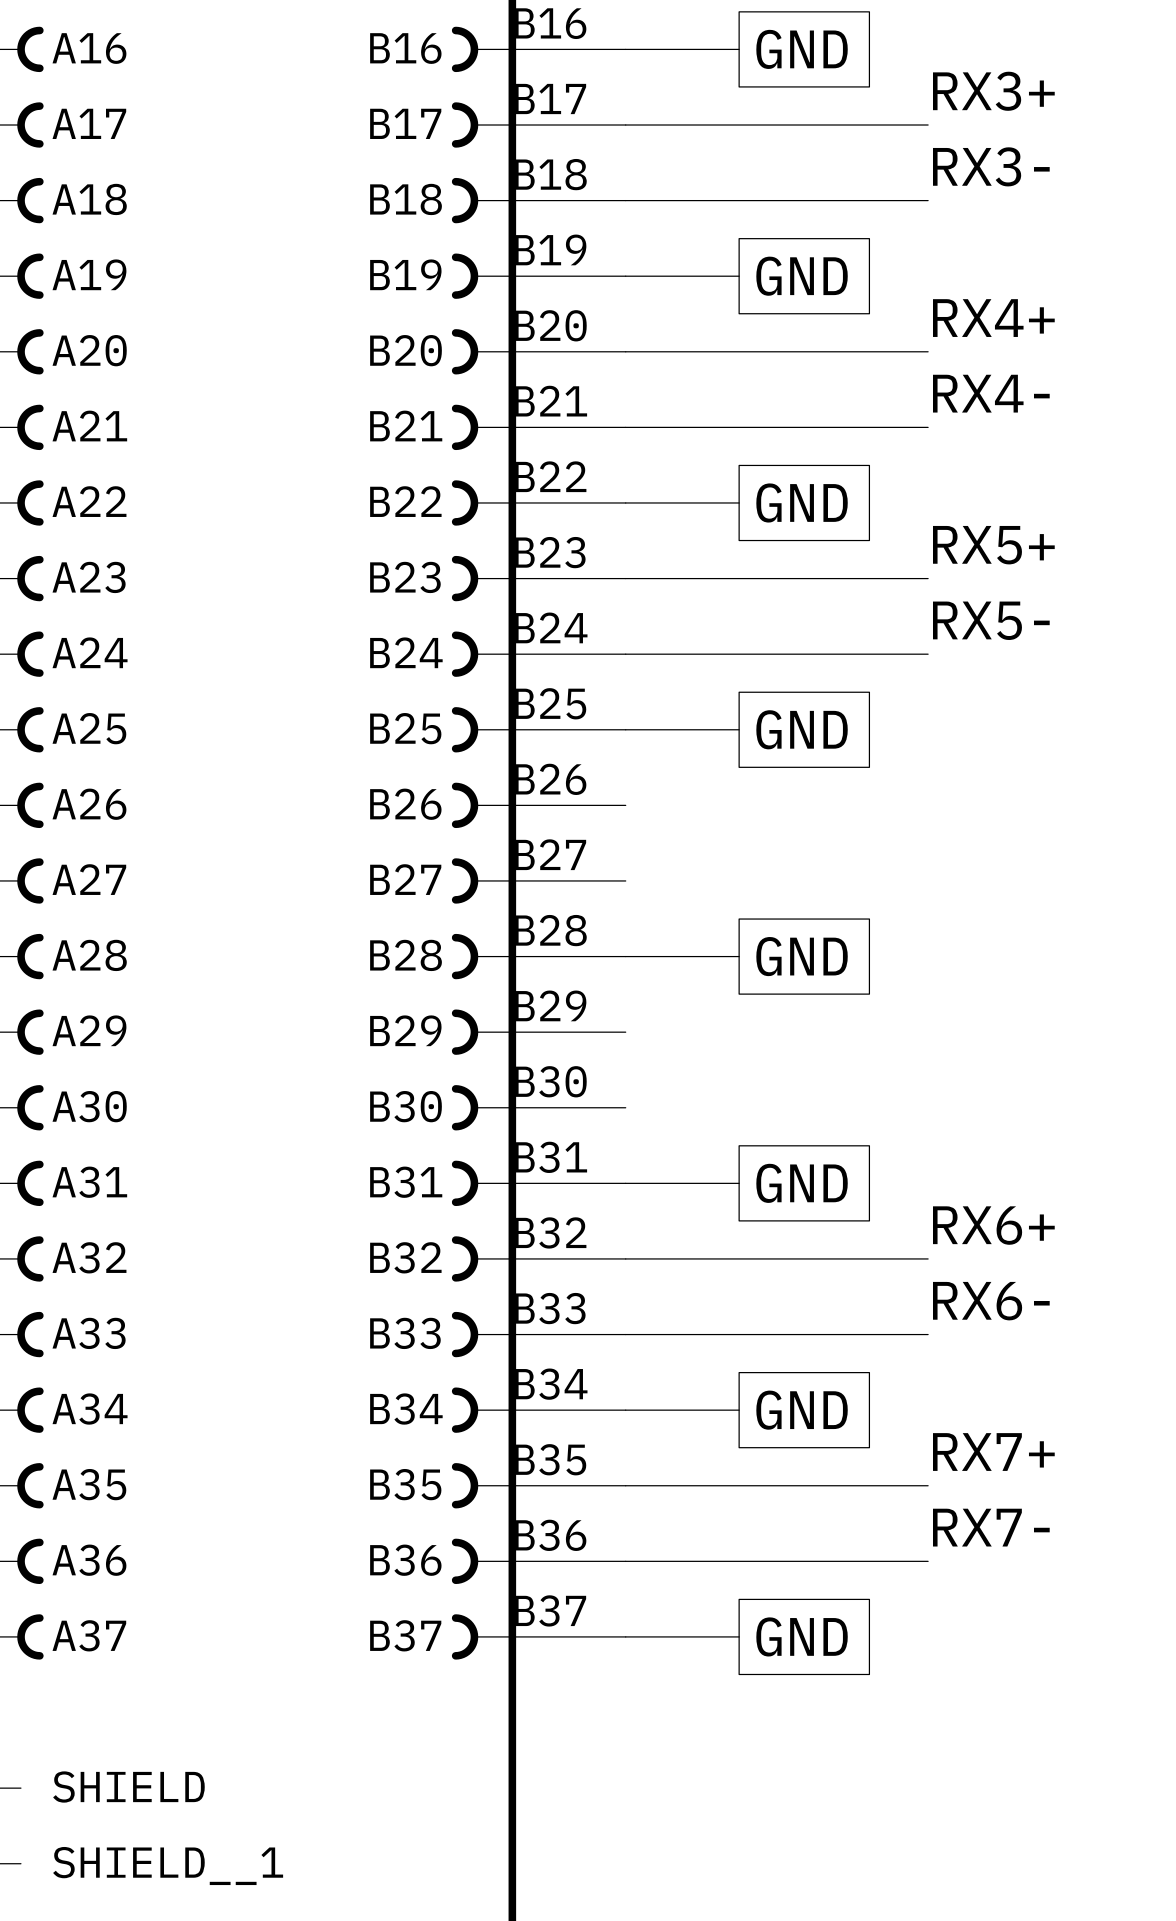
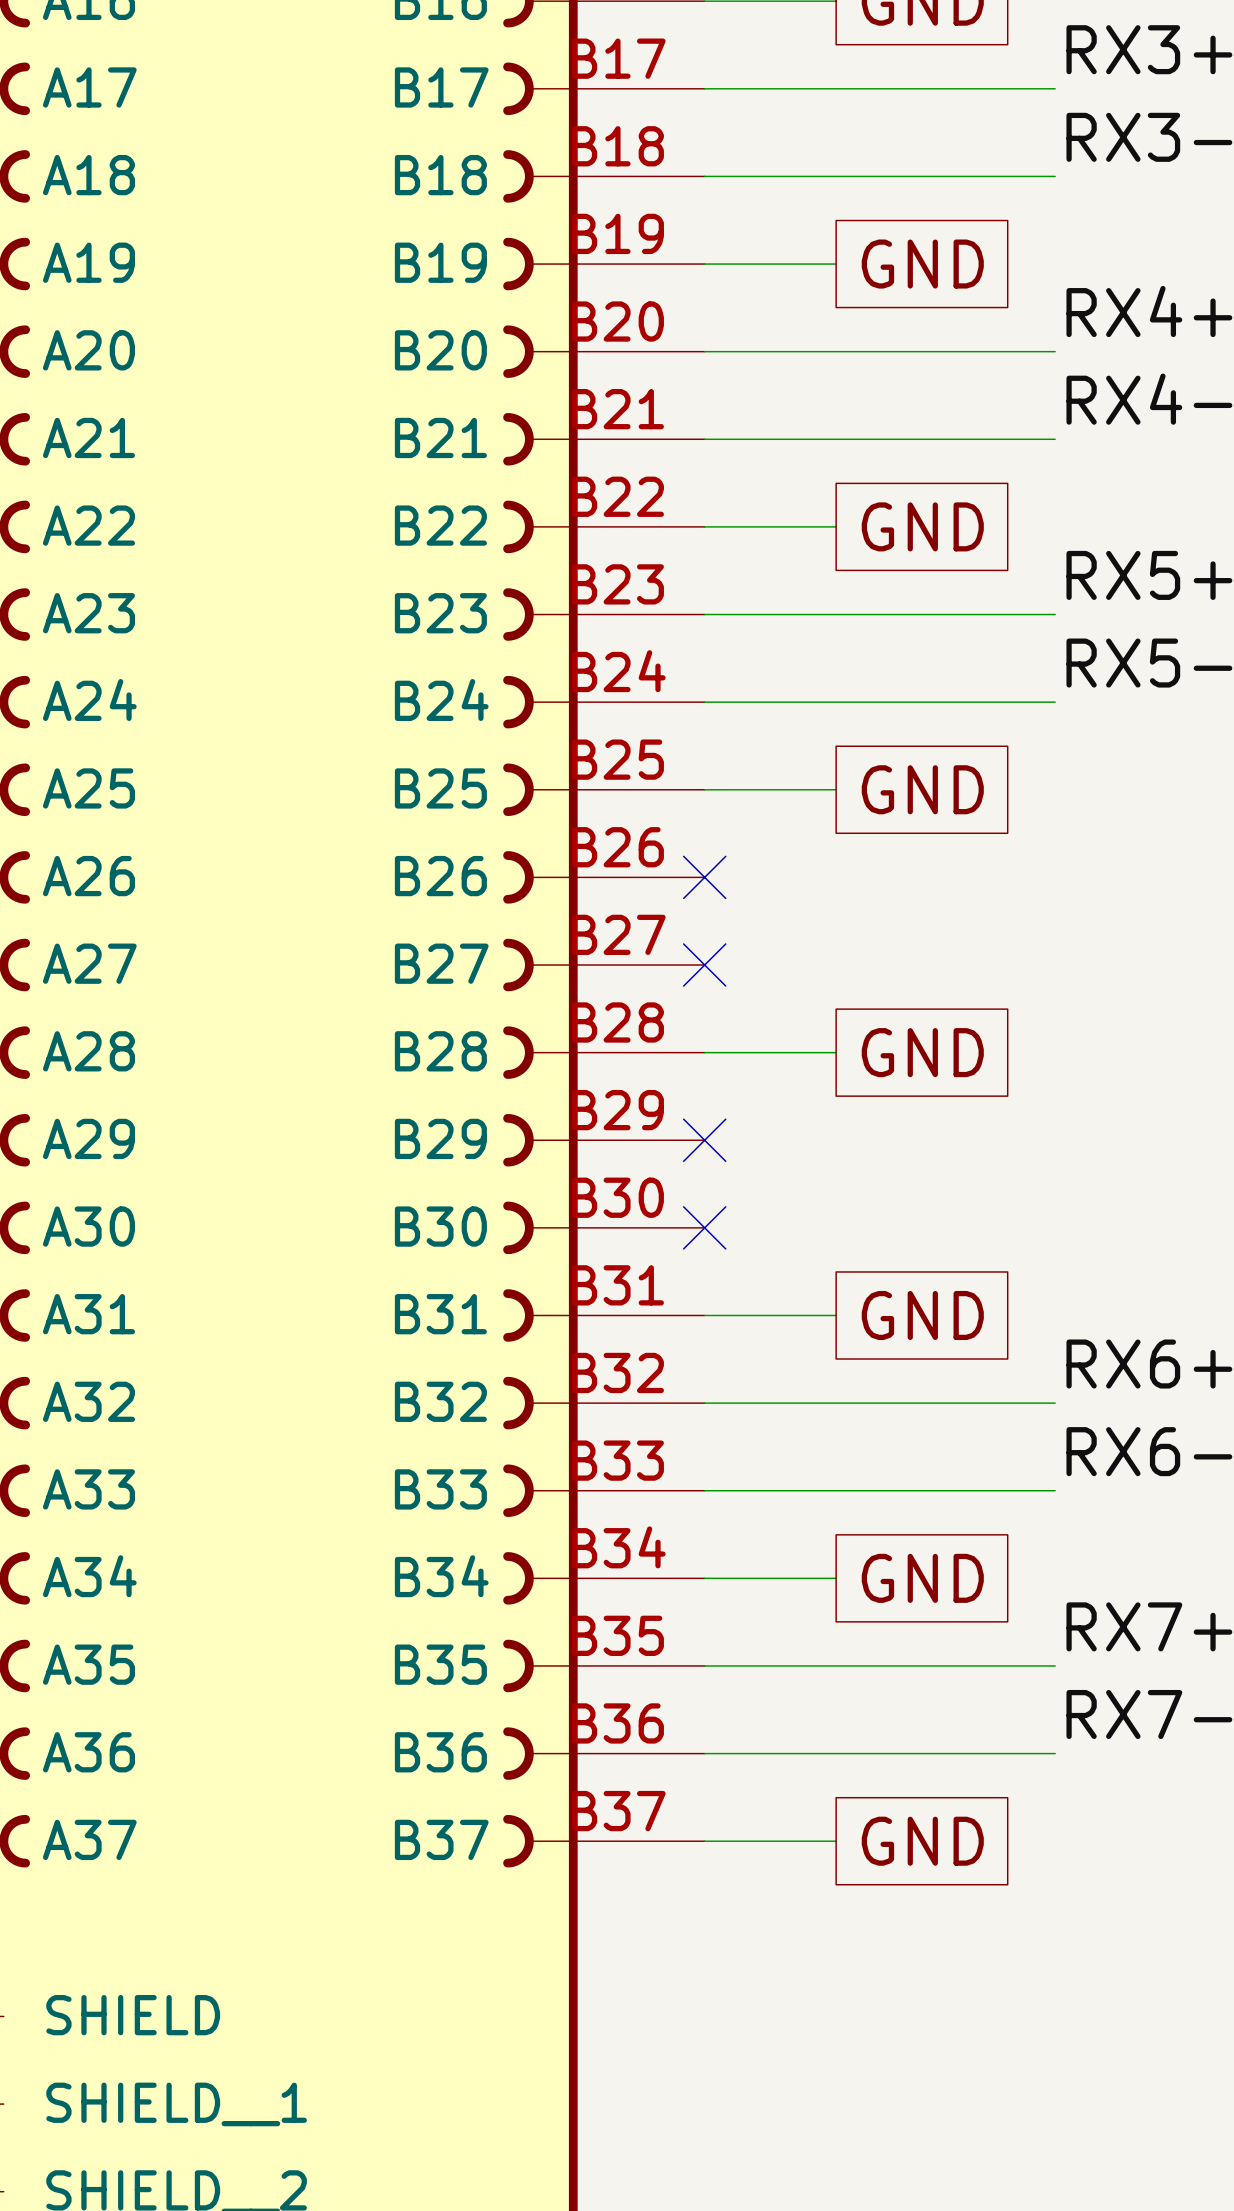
no-connect mark: none -> (704, 877)
no-connect mark: none -> (704, 965)
no-connect mark: none -> (704, 1140)
no-connect mark: none -> (704, 1227)

